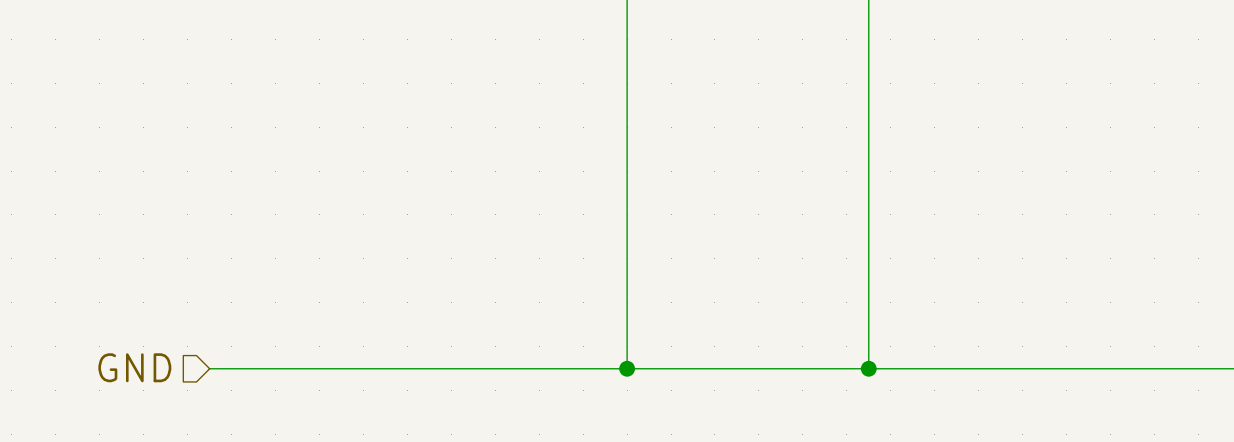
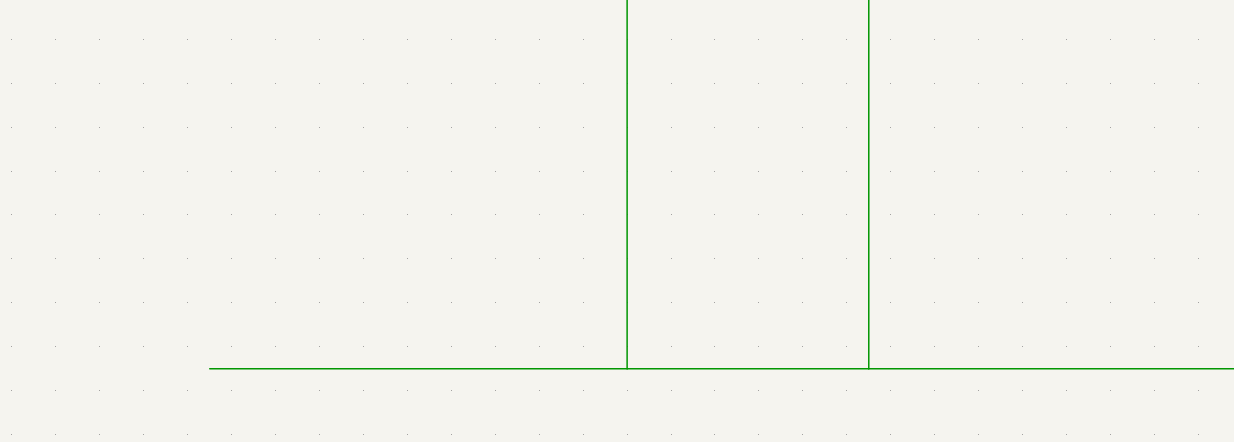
hierarchical label: GND (134, 367) -> none
junction: (627, 368) -> none
junction: (868, 368) -> none

